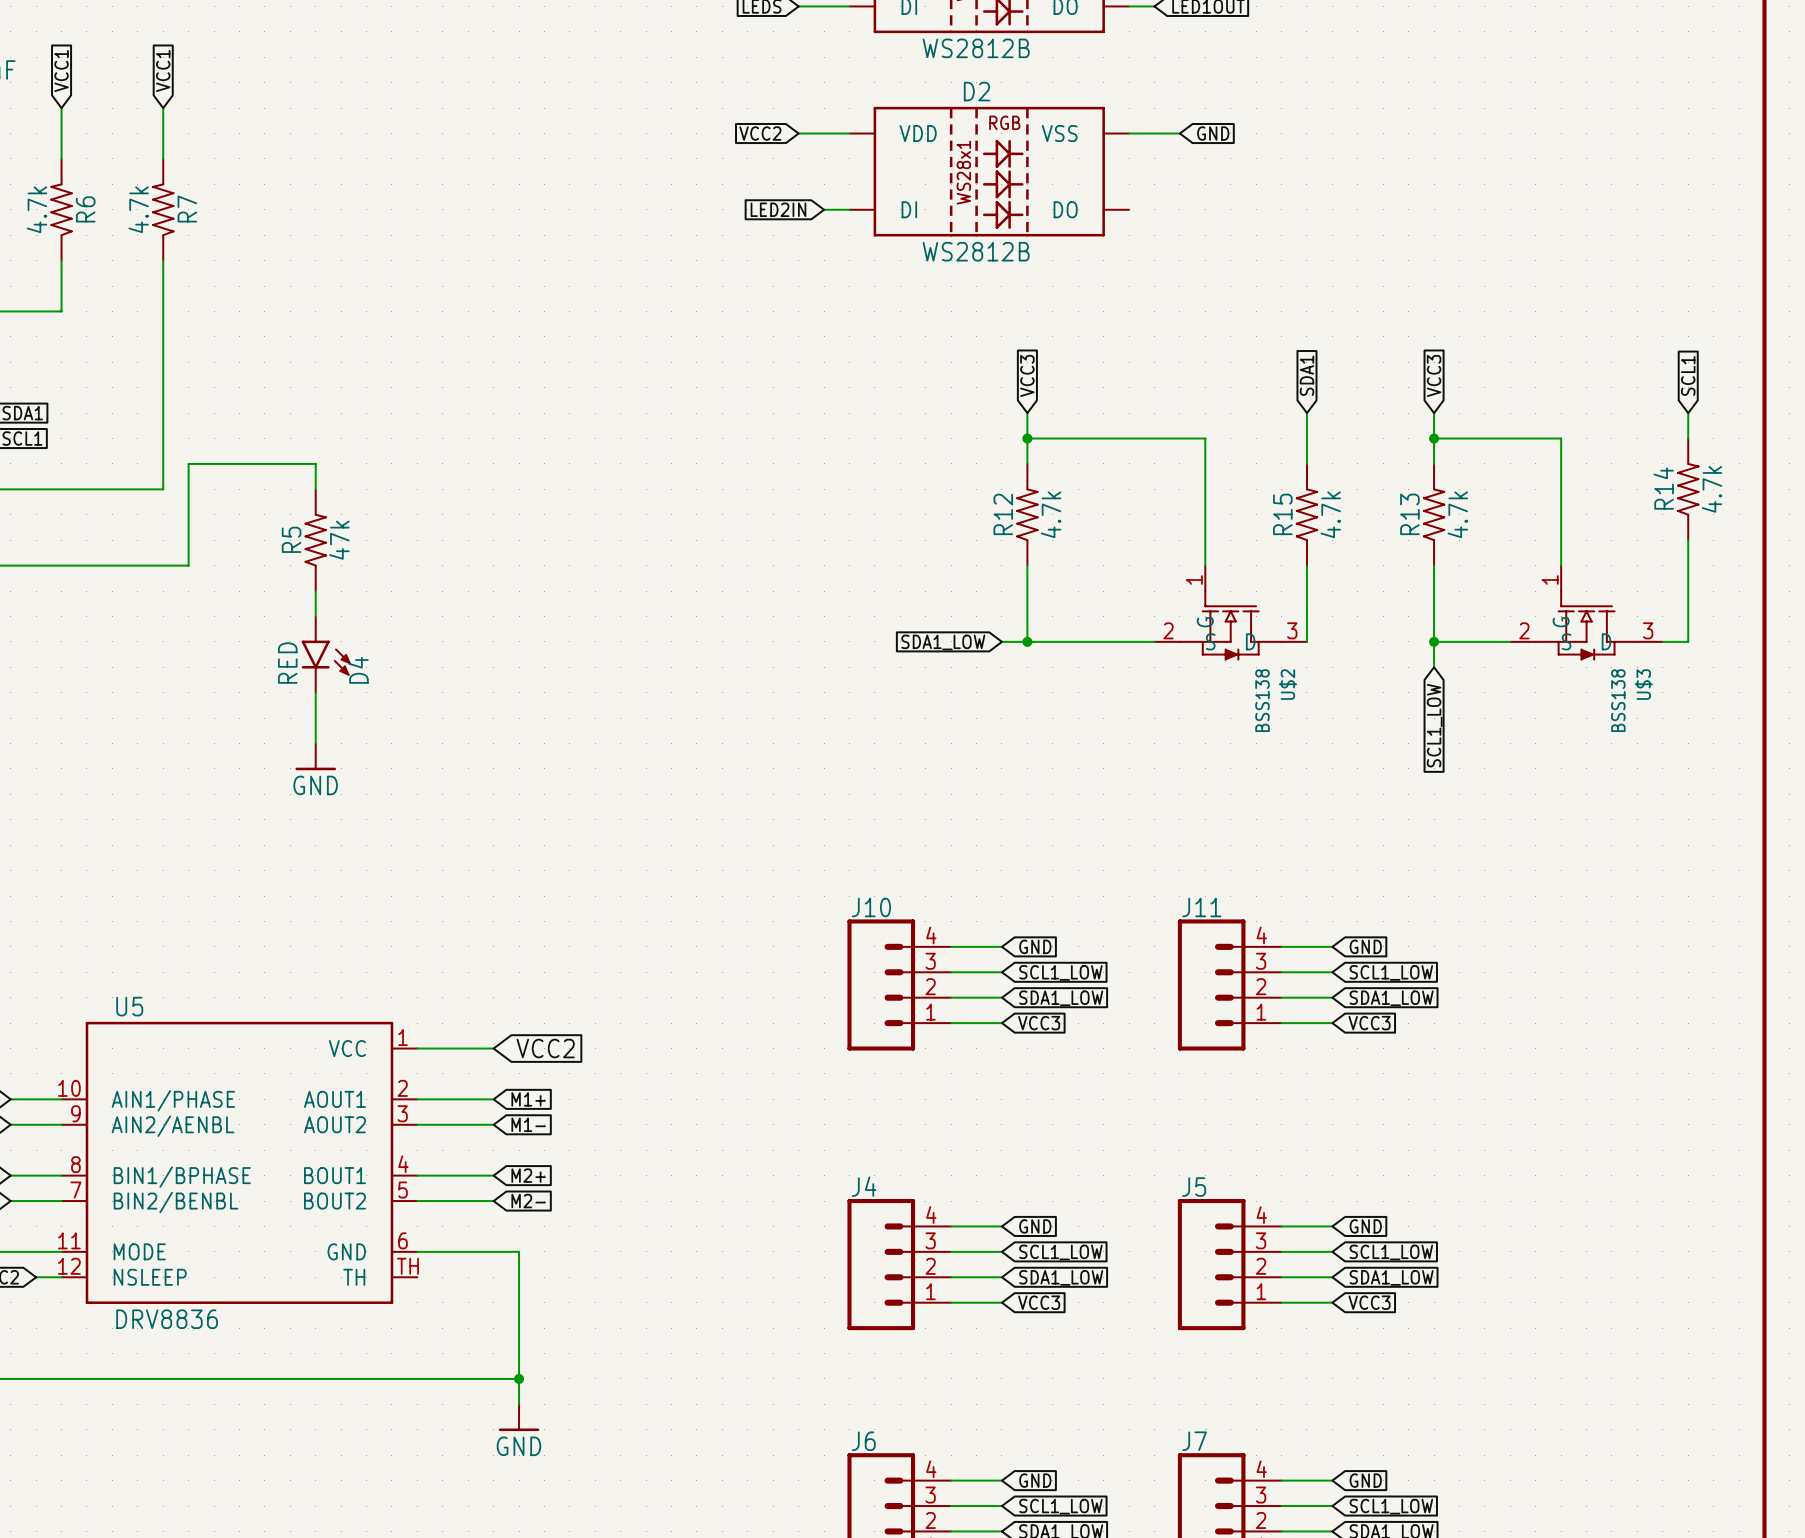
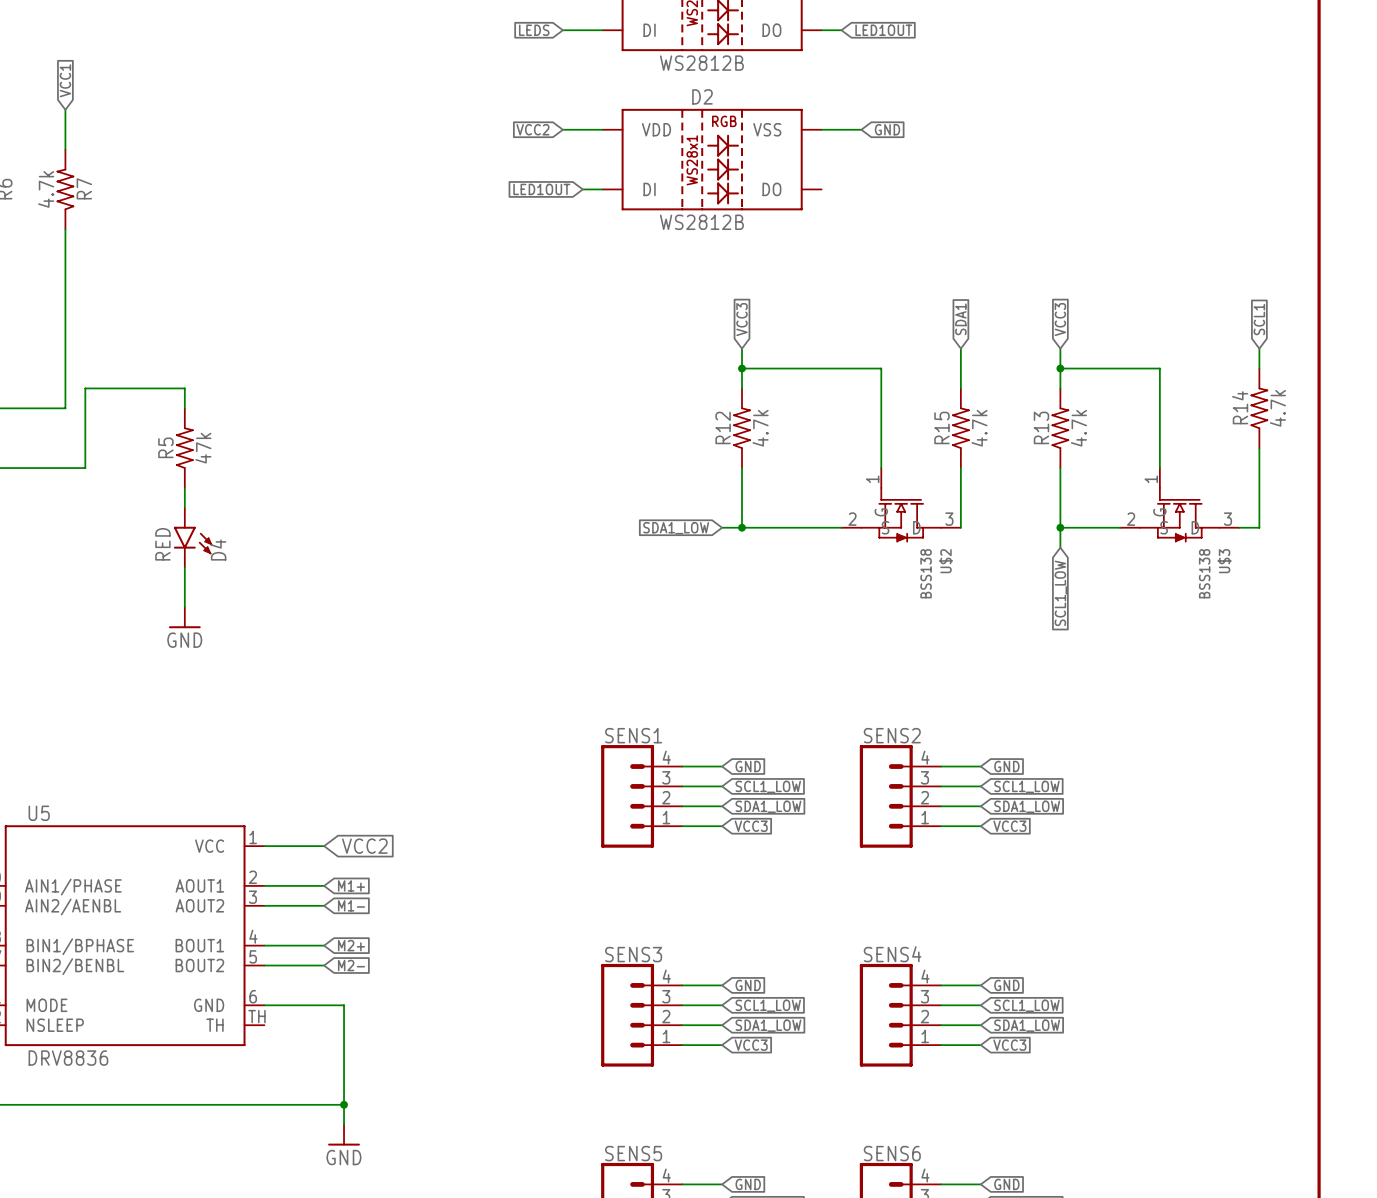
global label: LED2IN (778, 209) -> LED1OUT (541, 189)
J10 name: J10 (871, 907) -> SENS1 (633, 735)
J11 name: J11 (1201, 907) -> SENS2 (892, 735)
J4 name: J4 (864, 1186) -> SENS3 (633, 954)
J5 name: J5 (1194, 1187) -> SENS4 (892, 954)
J6 name: J6 (863, 1441) -> SENS5 (633, 1153)
J7 name: J7 (1194, 1441) -> SENS6 (892, 1153)

